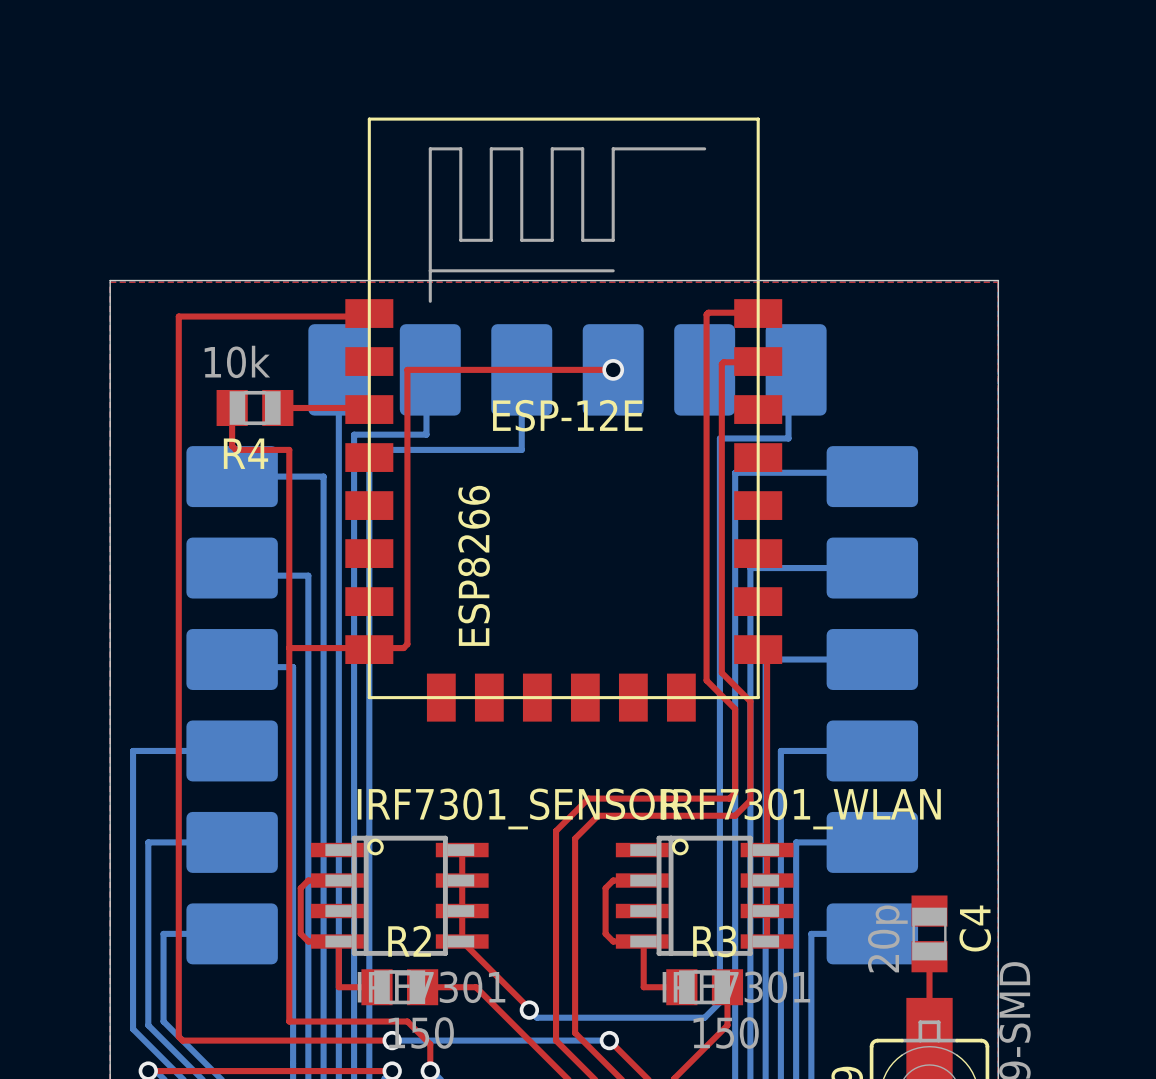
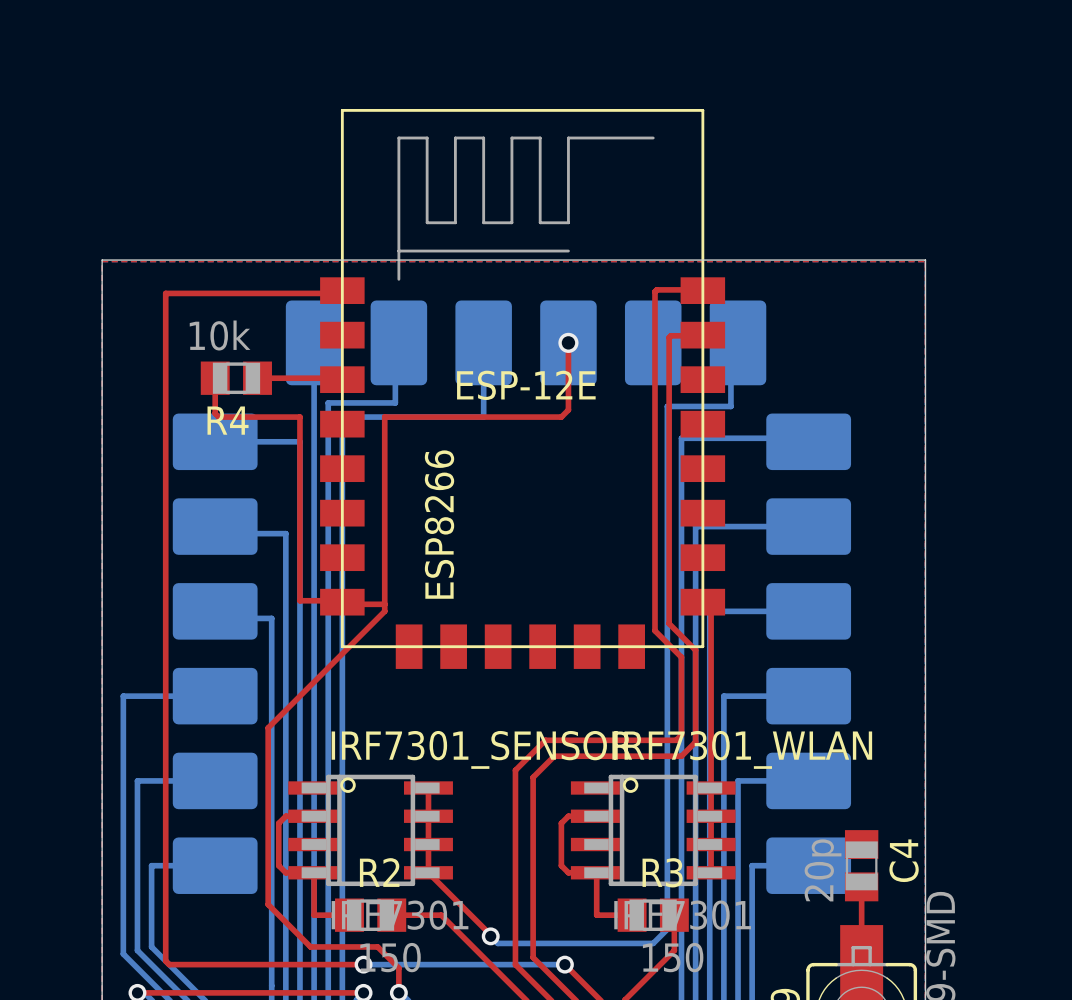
top track: (613, 369) (407, 369) (407, 644) (403, 648) (375, 648) (371, 651) -> (568, 342) (568, 410) (561, 417) (384, 417) (384, 611) (268, 727)
top track: (289, 449) (289, 785) -> (268, 417) (299, 417) (299, 600)
top track: (289, 648) (323, 648) -> none
top track: none -> (344, 604) (384, 604)
top track: (289, 975) (289, 1021) (335, 1021) -> (268, 904) (310, 946)

